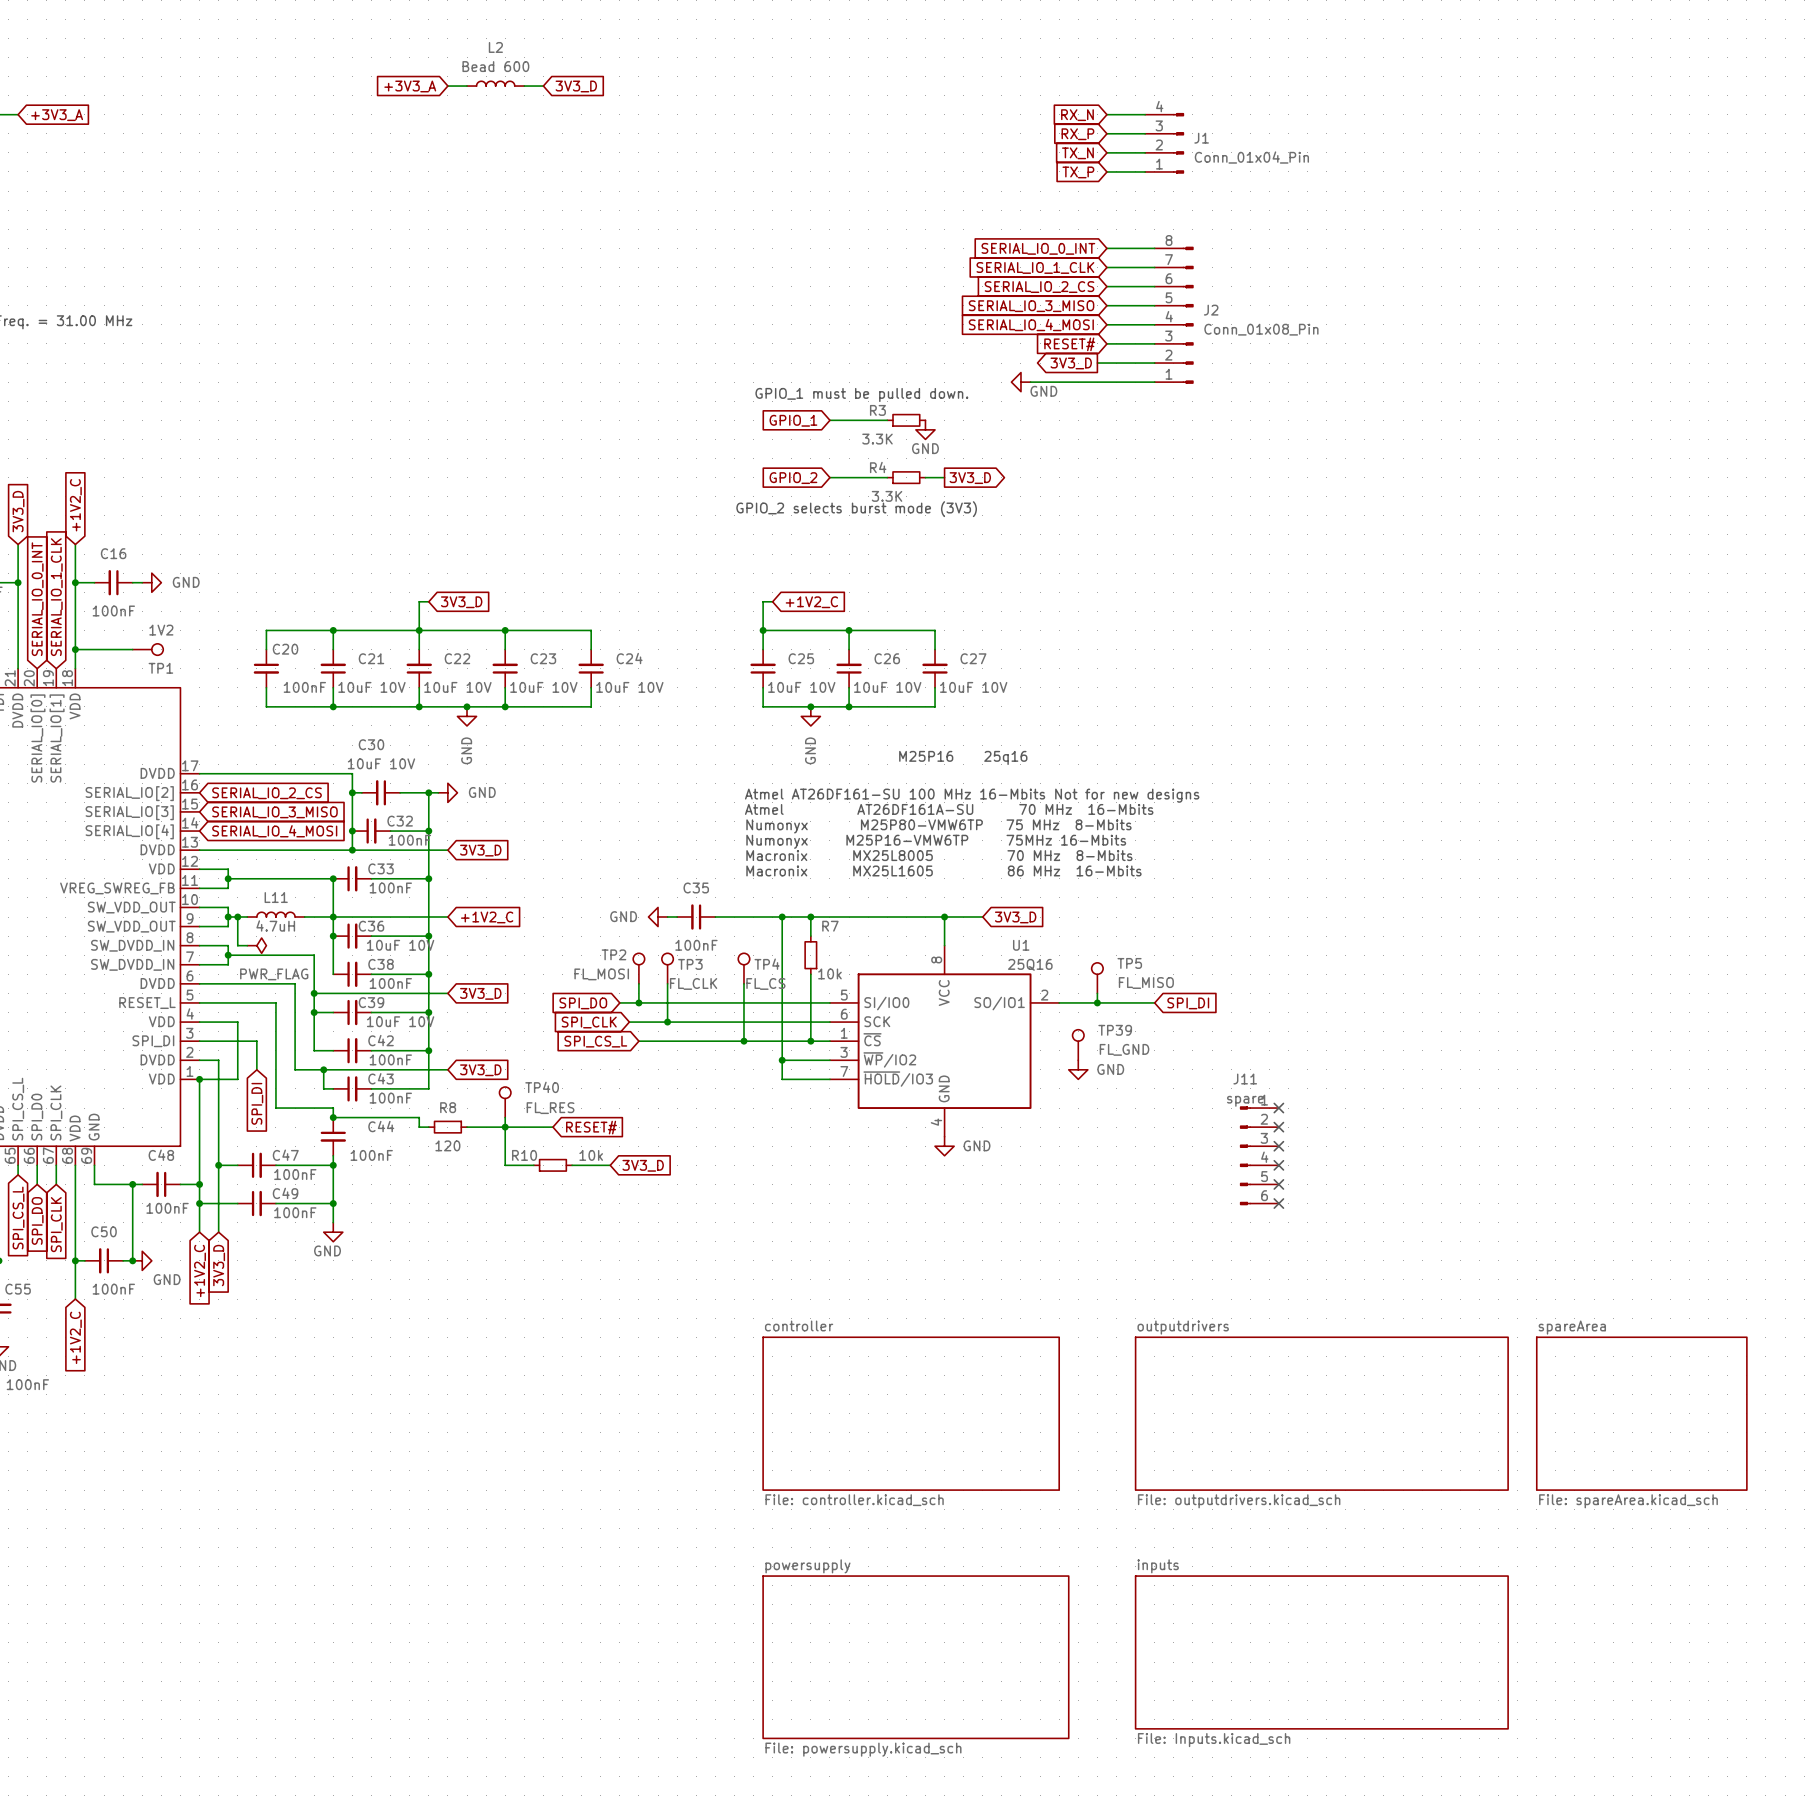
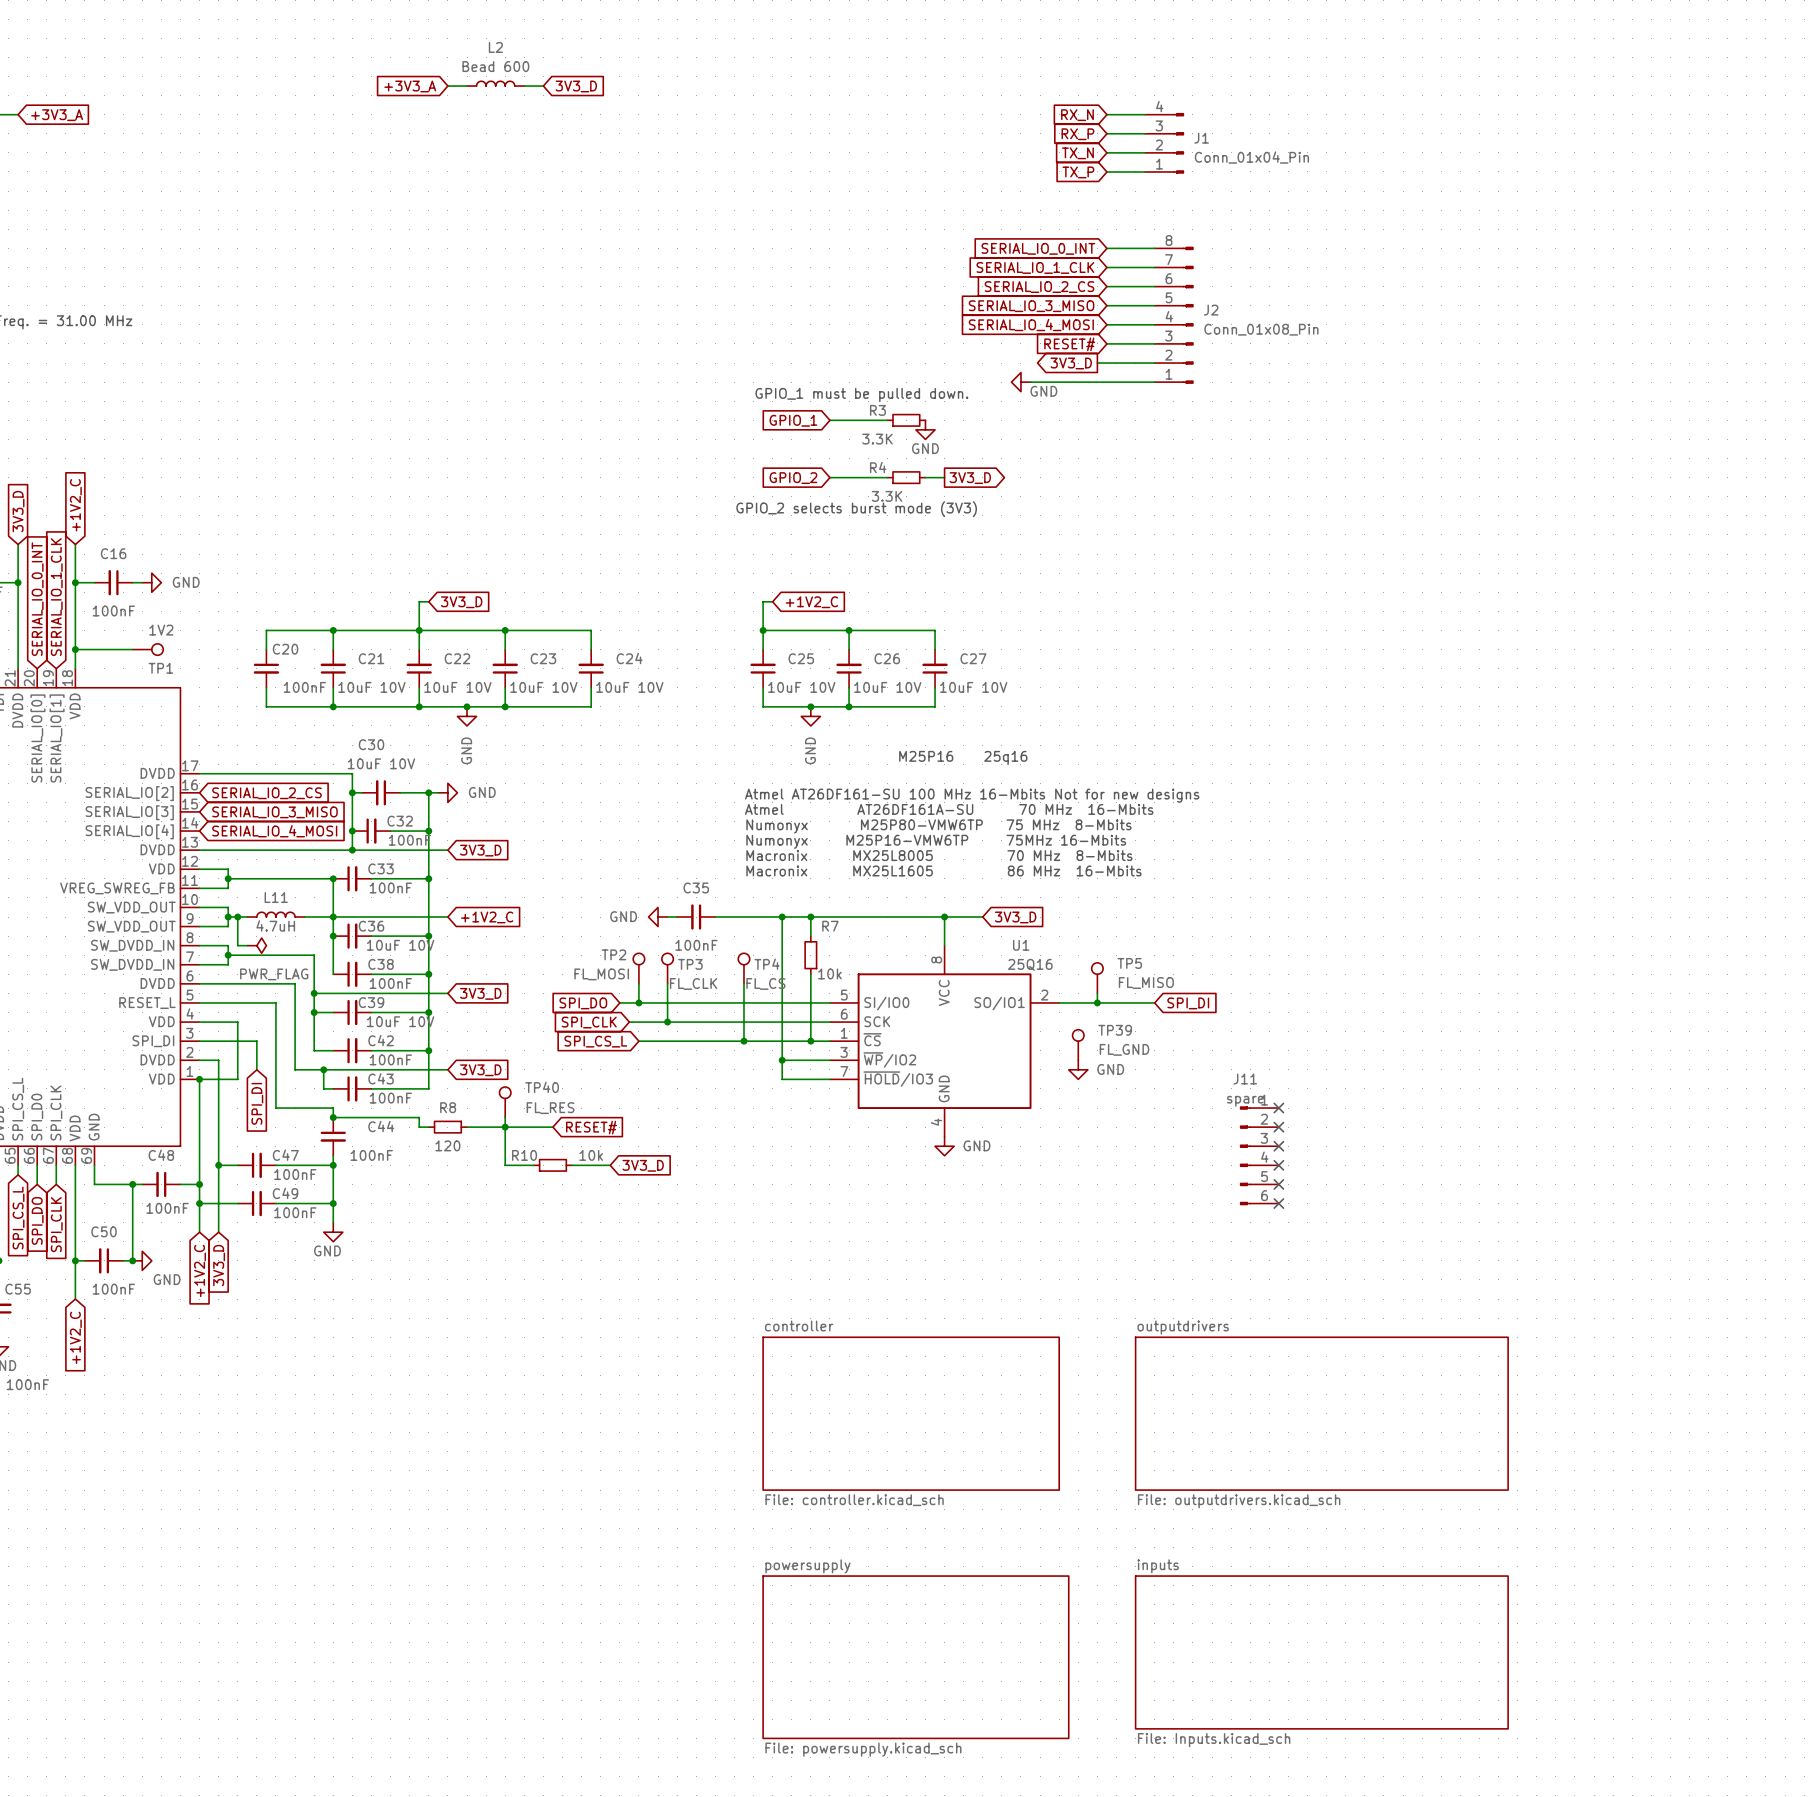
sheet spareArea: File: spareArea.kicad_sch (1641, 1413) -> none

